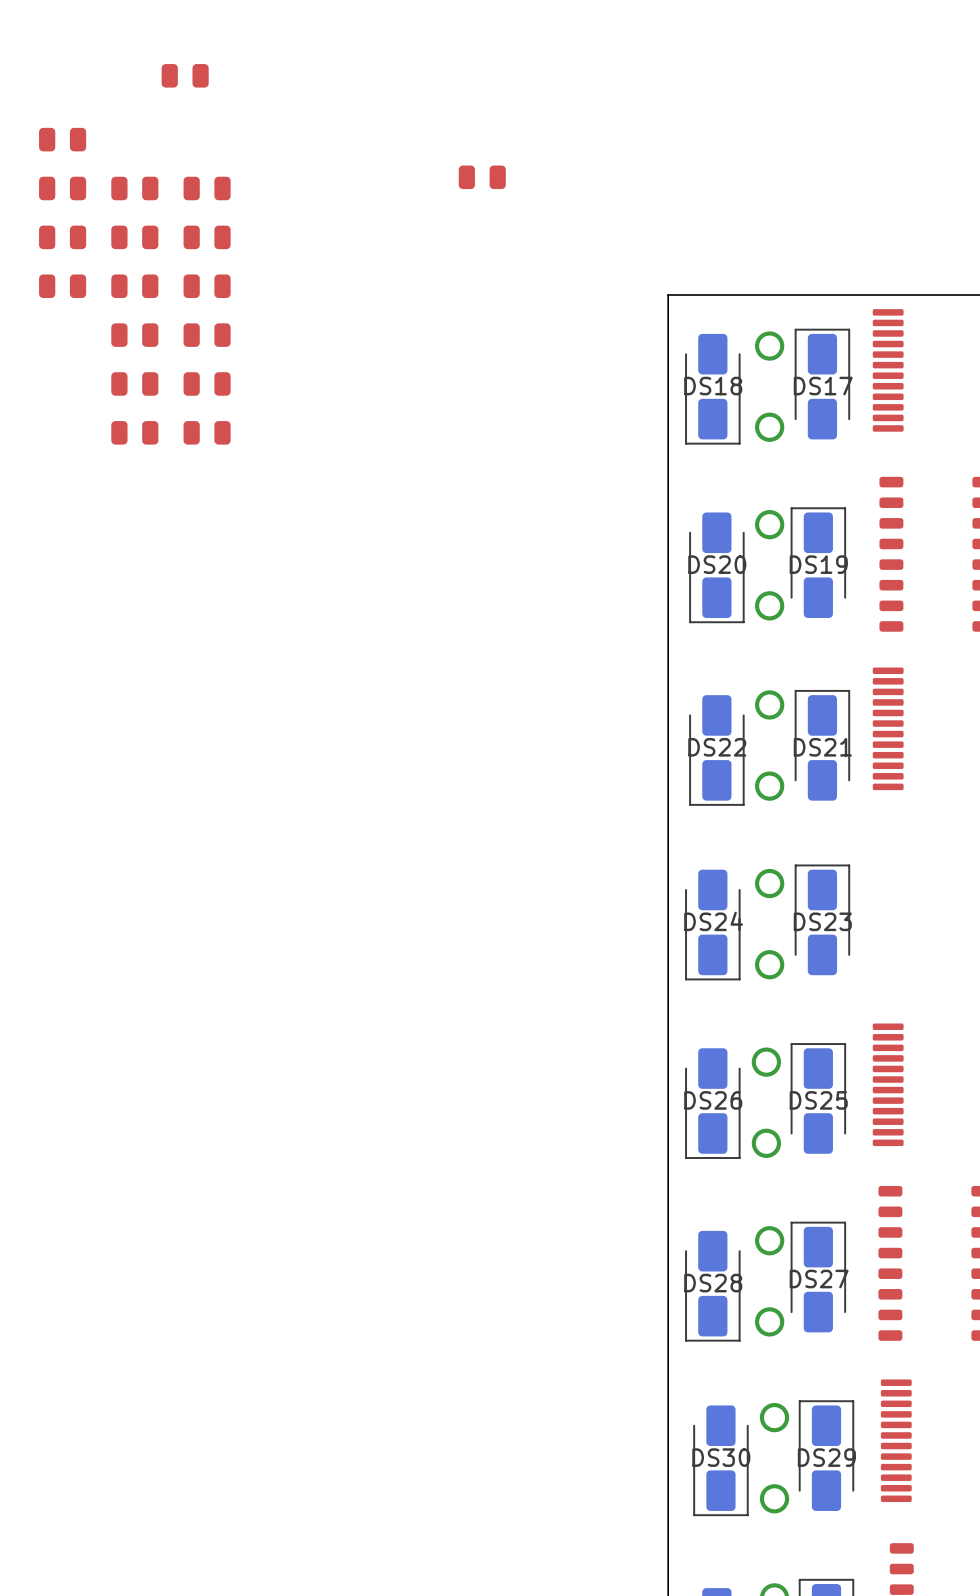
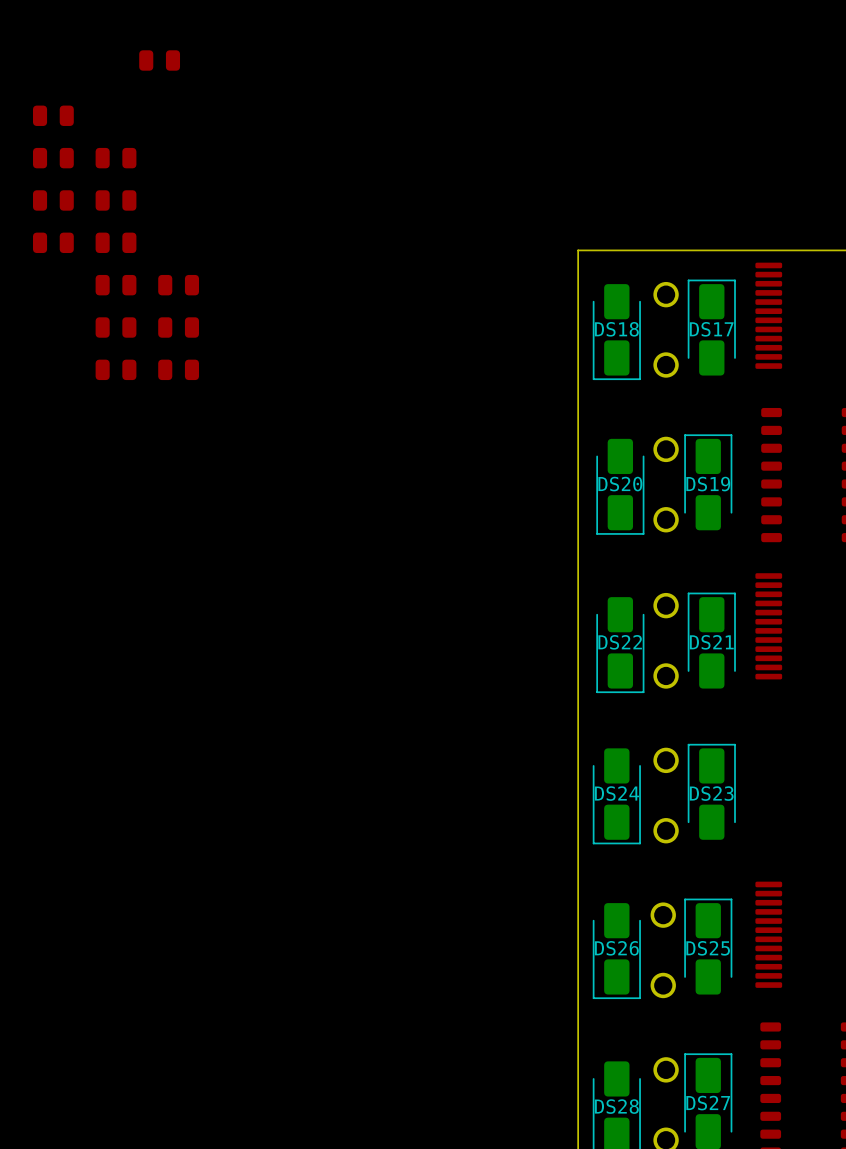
part: (482, 177) -> none
part: (207, 188) -> none
part: (207, 237) -> none
part: (207, 286) -> none

